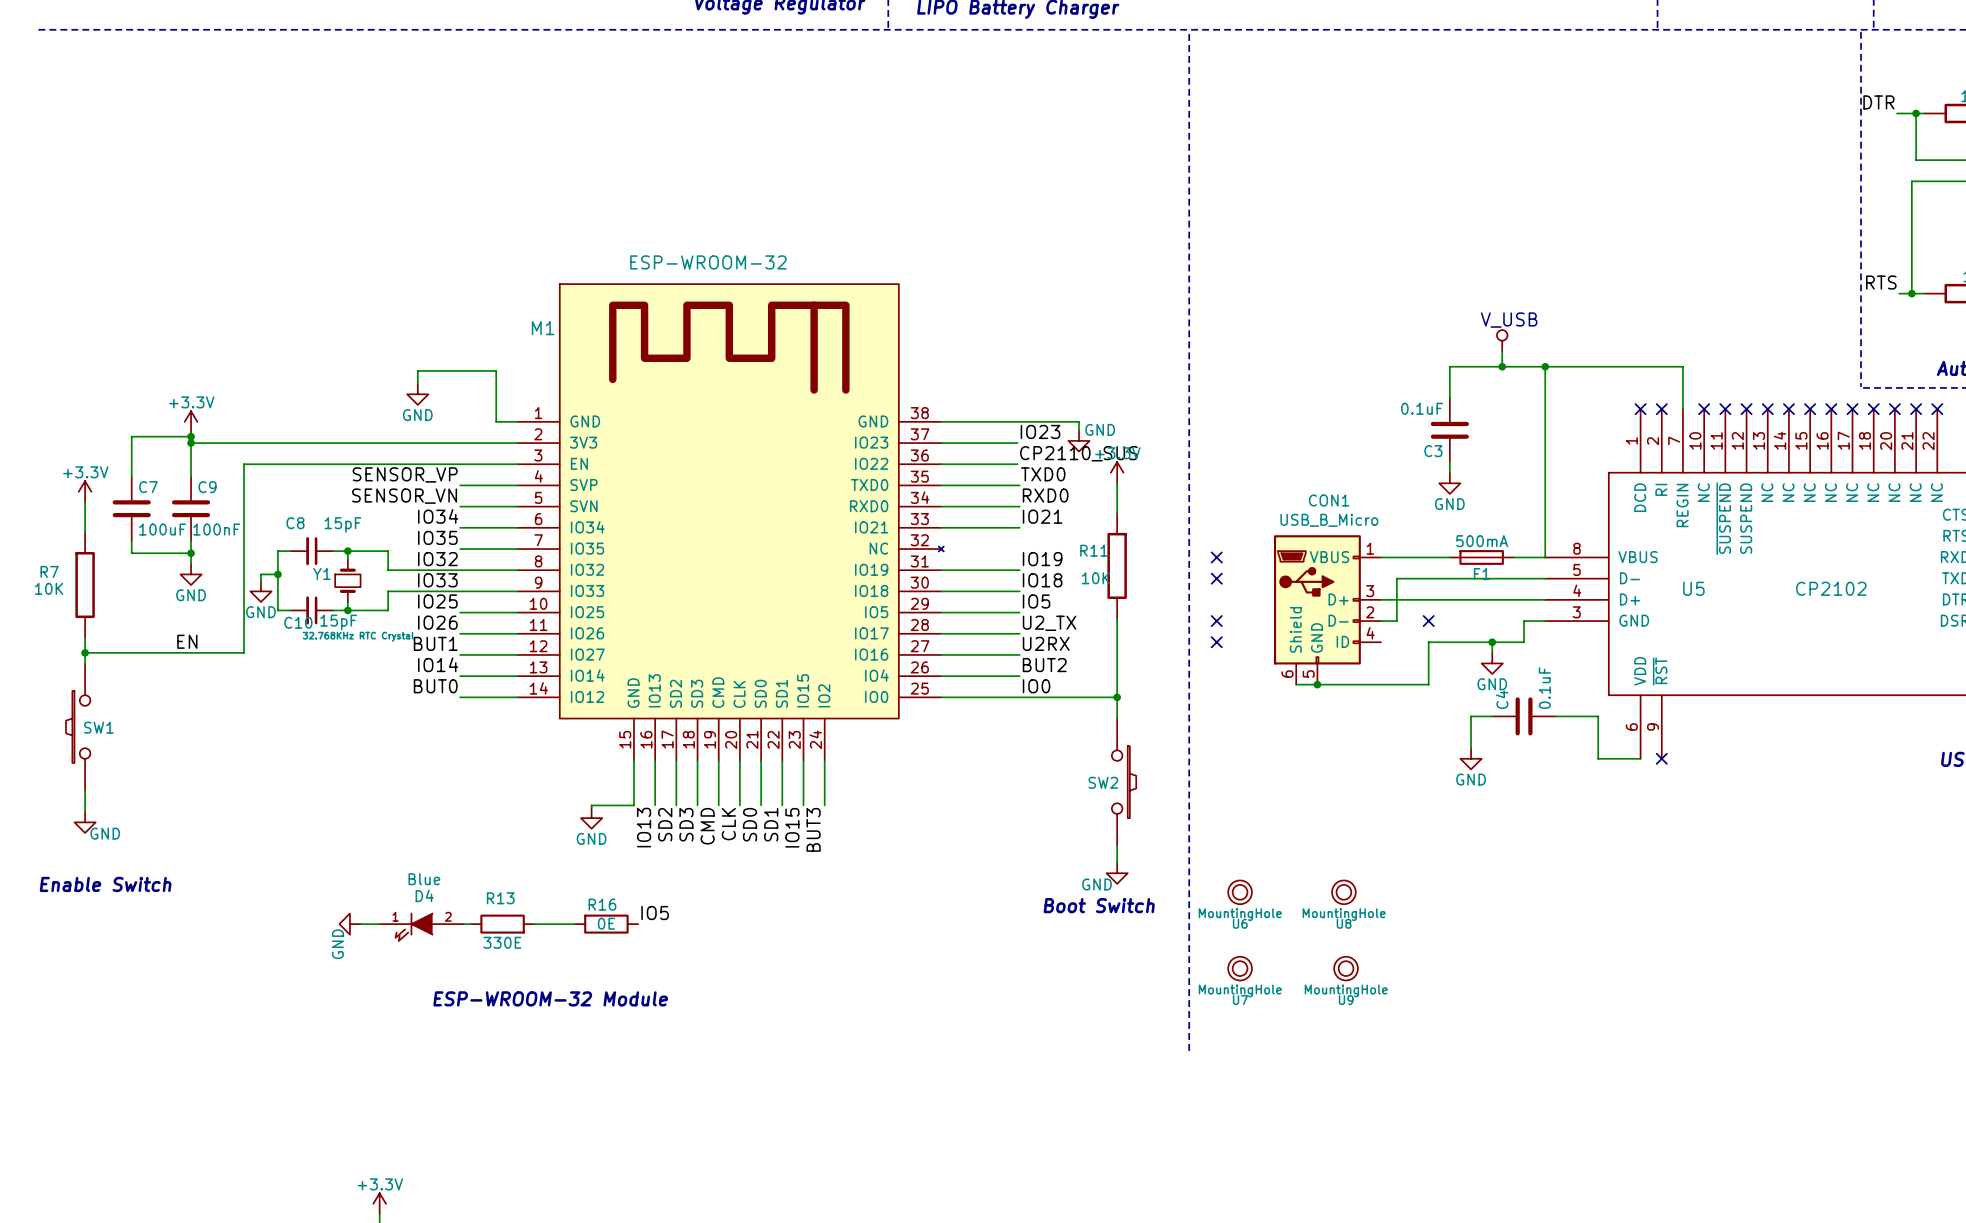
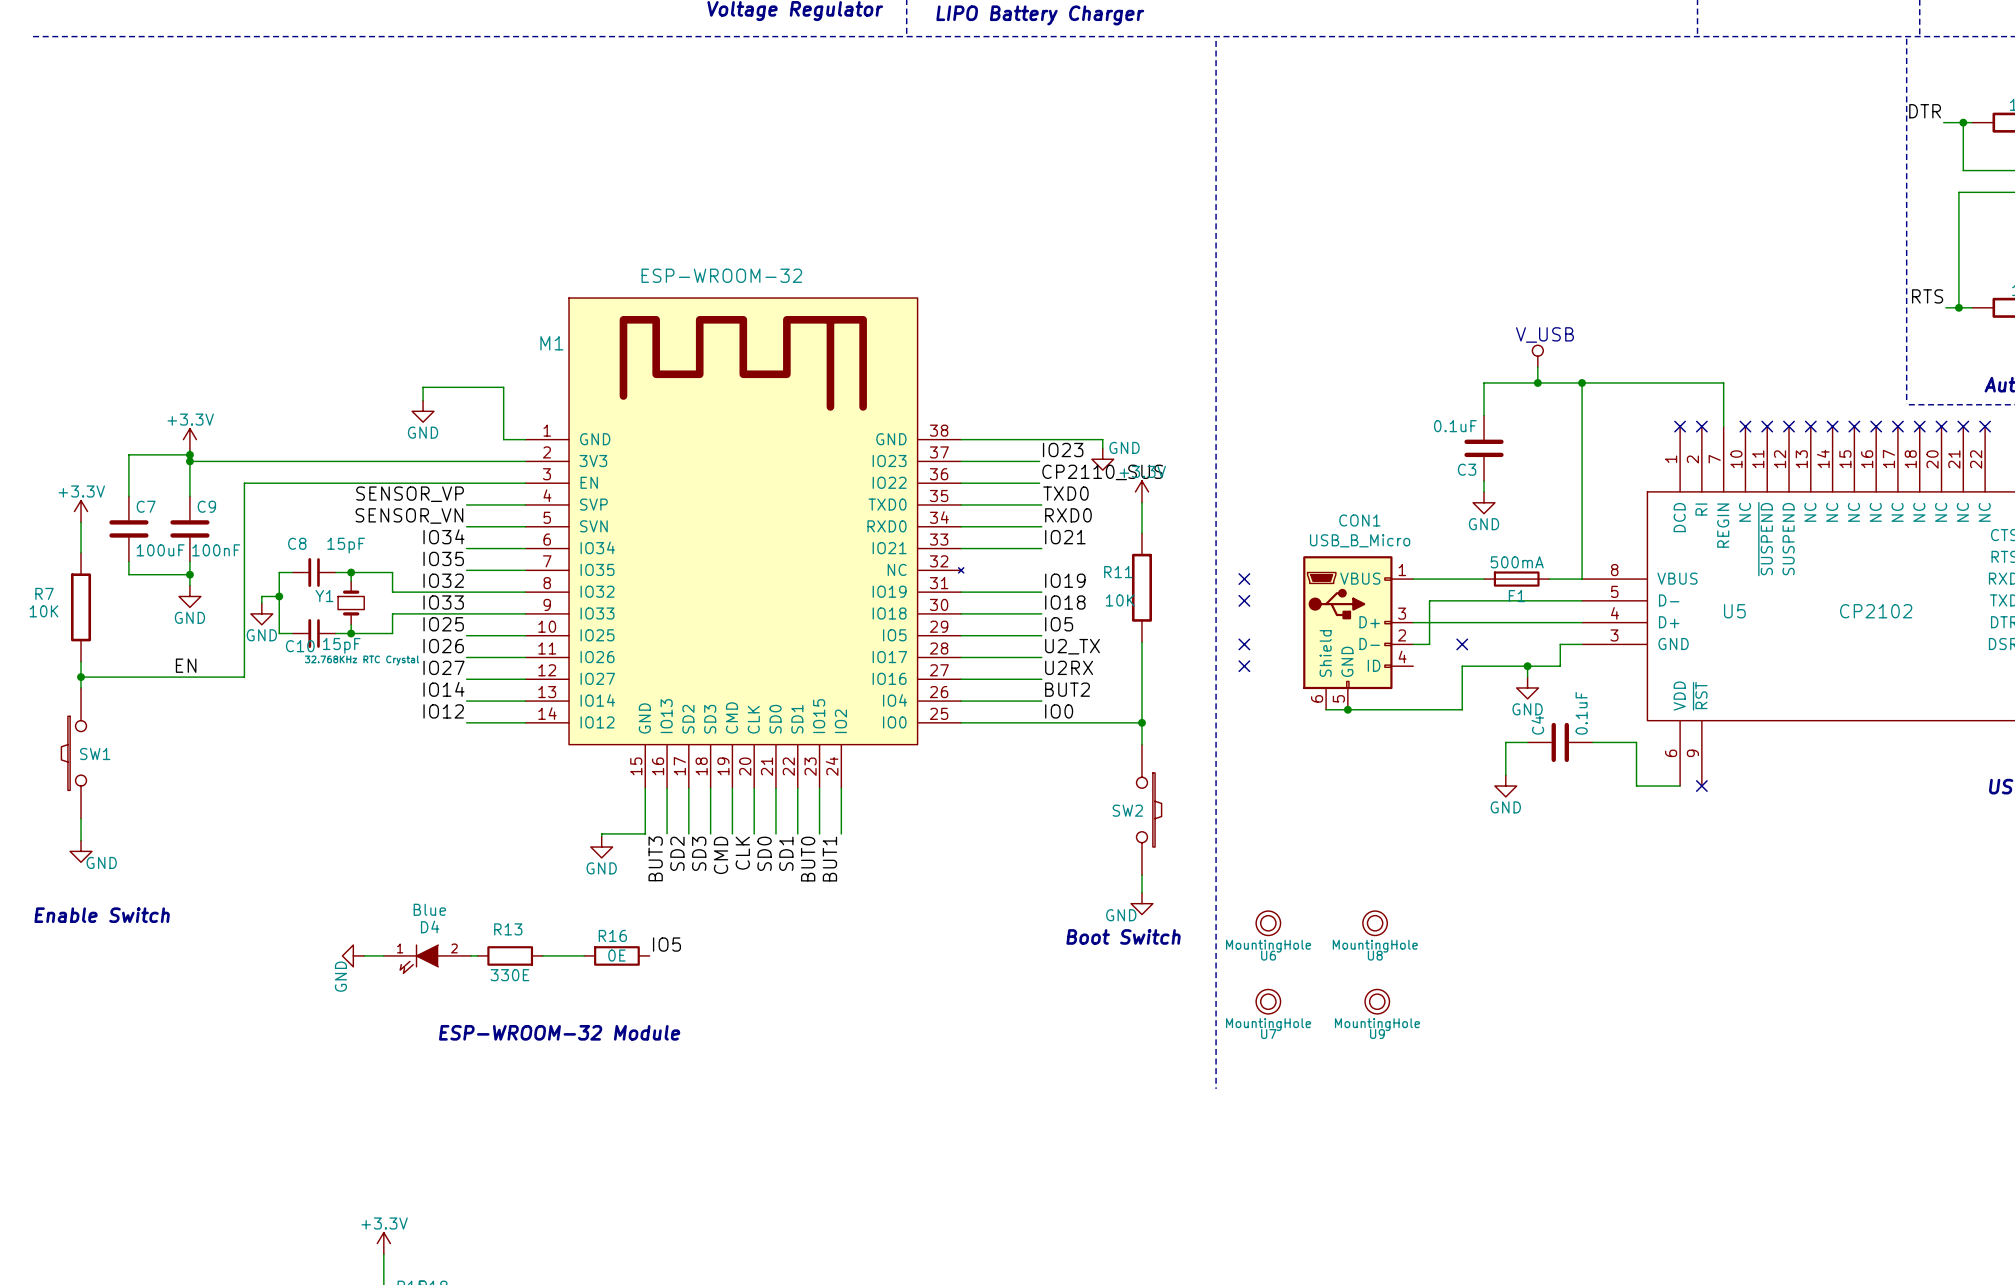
label: BUT1 (435, 643) -> IO27 (443, 667)
label: BUT0 (435, 686) -> IO12 (443, 711)
label: IO13 (644, 827) -> BUT3 (655, 858)
label: IO15 (792, 827) -> BUT0 (808, 859)
label: BUT3 (813, 829) -> BUT1 (829, 859)

